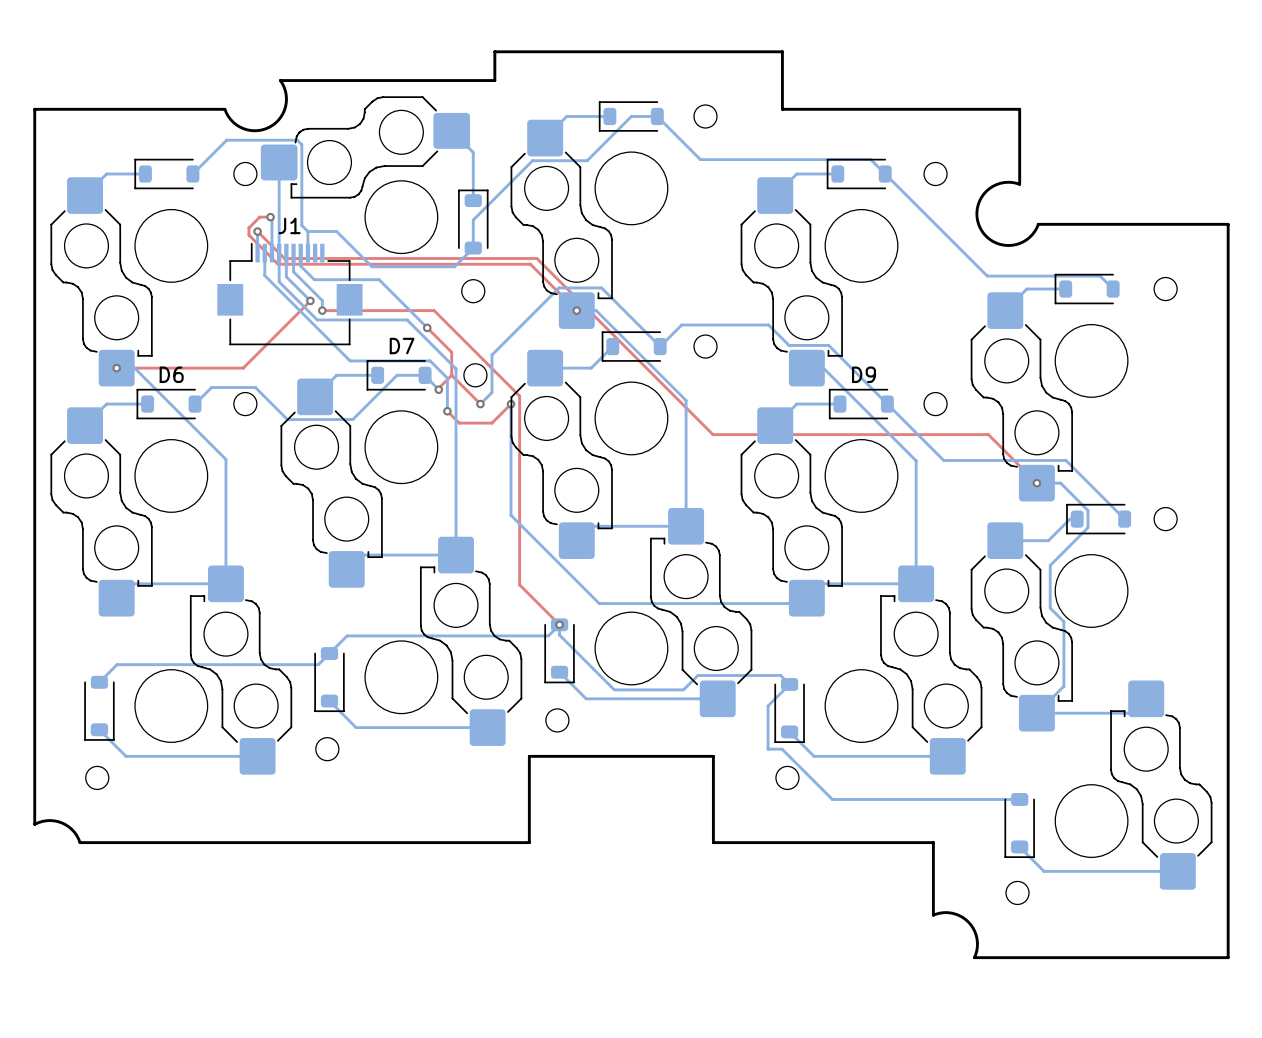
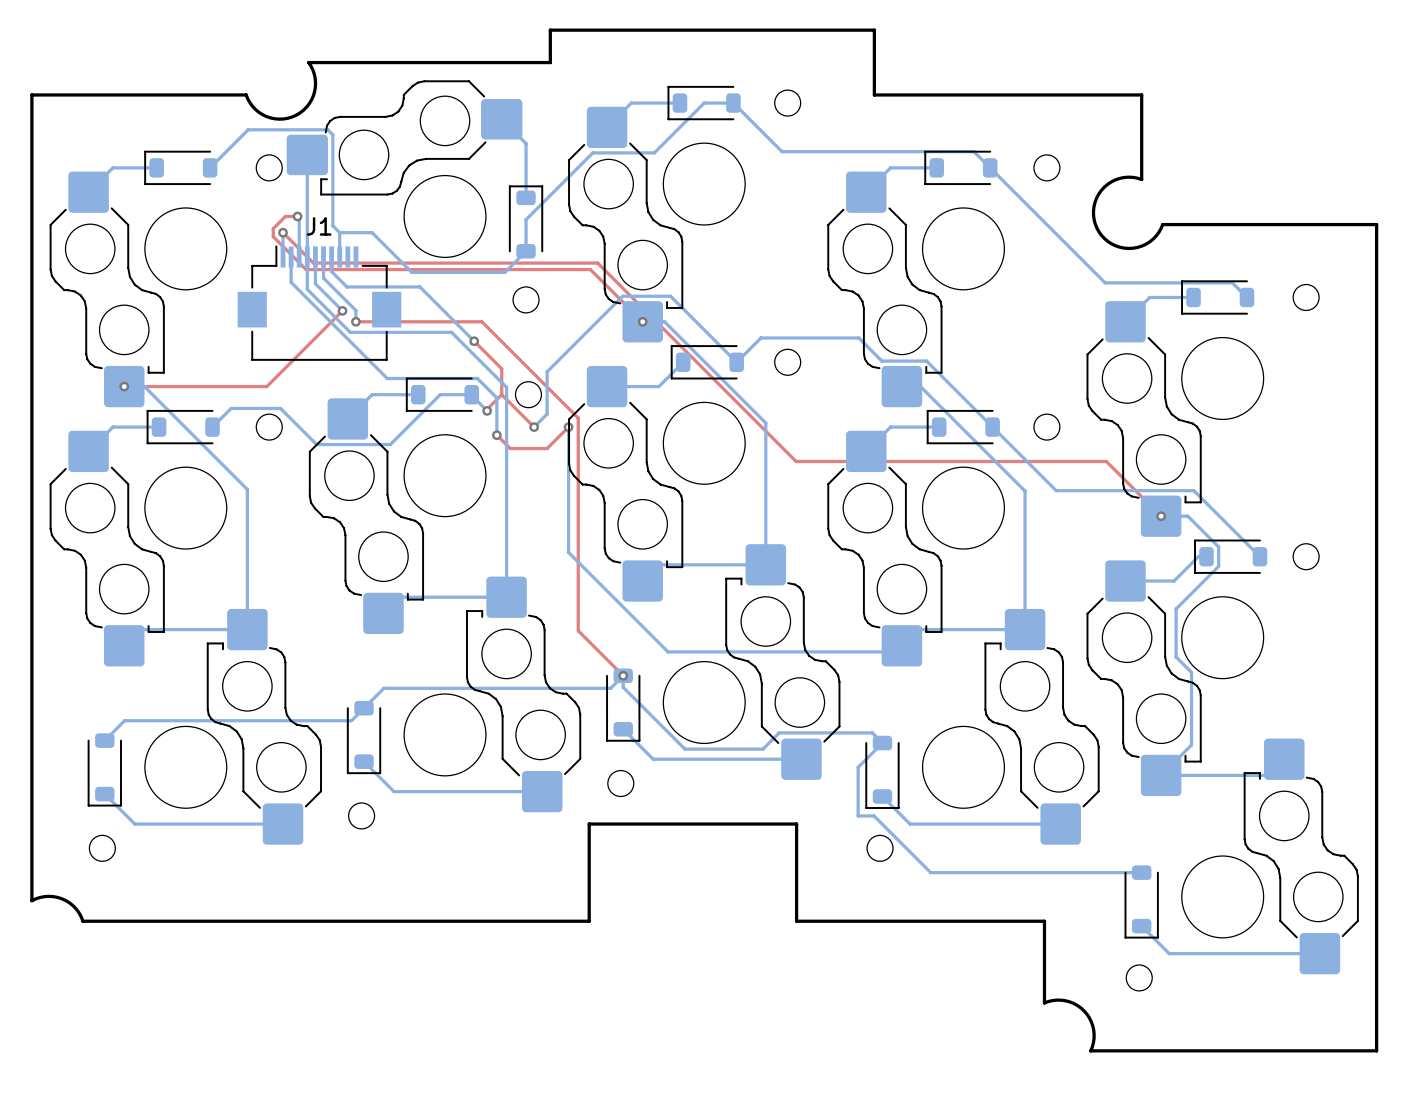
D7 name: D7 (402, 346) -> none
D6 name: D6 (171, 374) -> none
D9 name: D9 (864, 374) -> none

